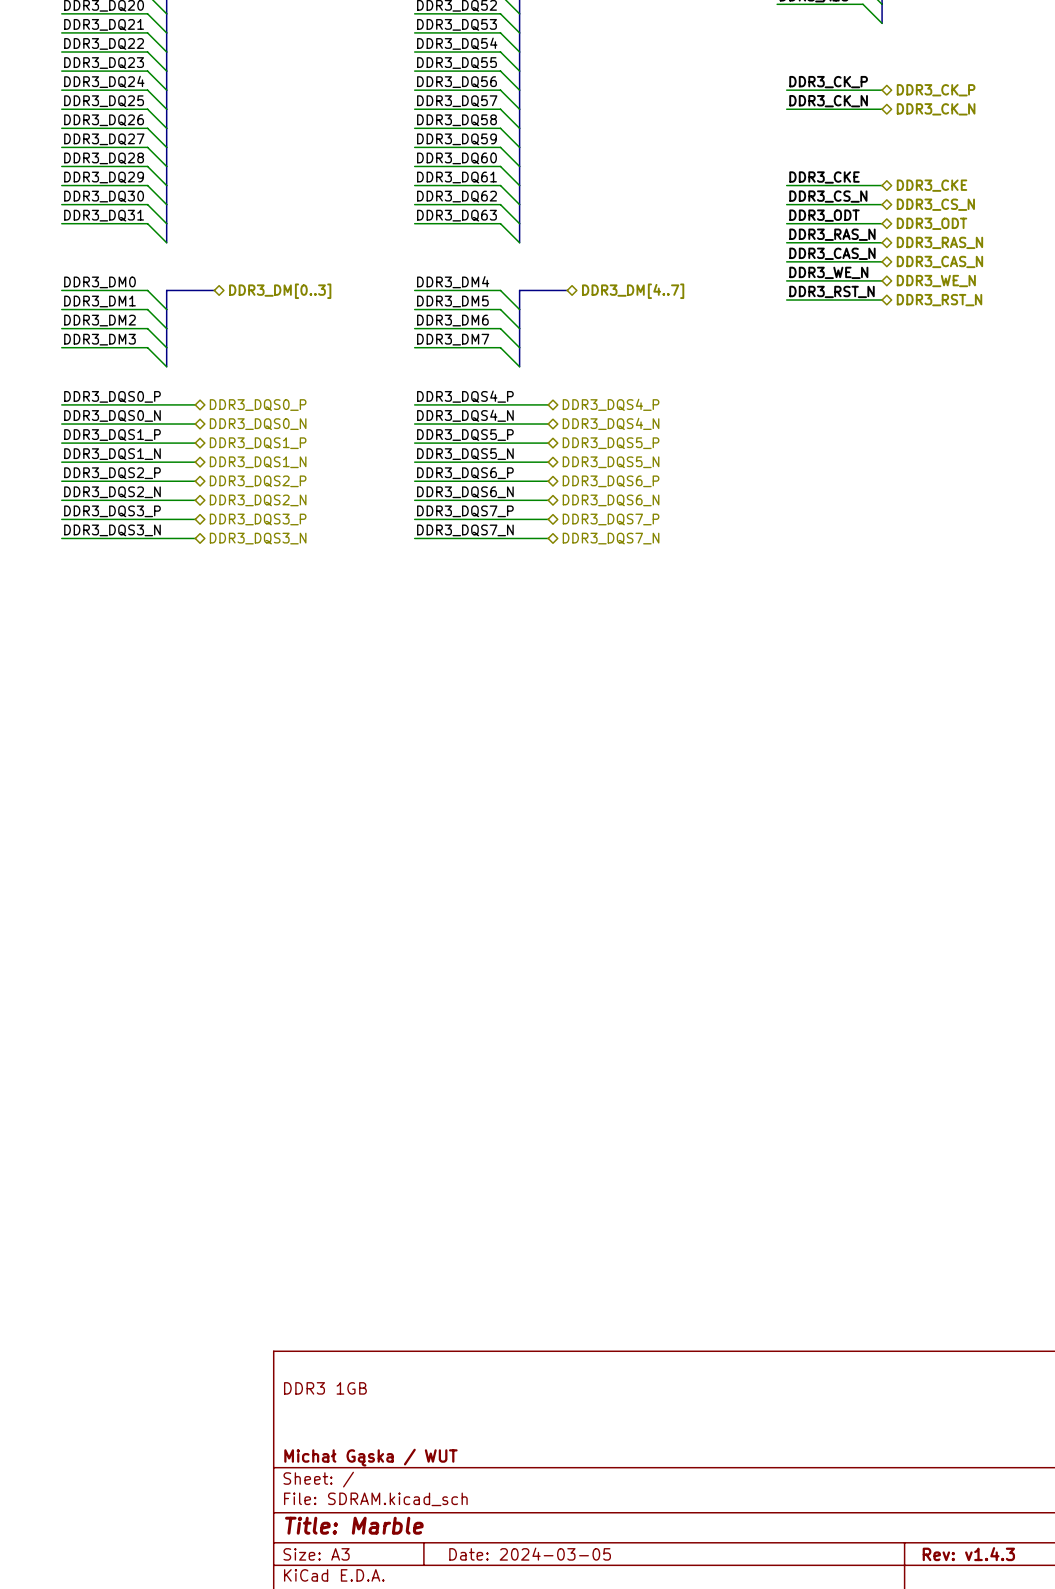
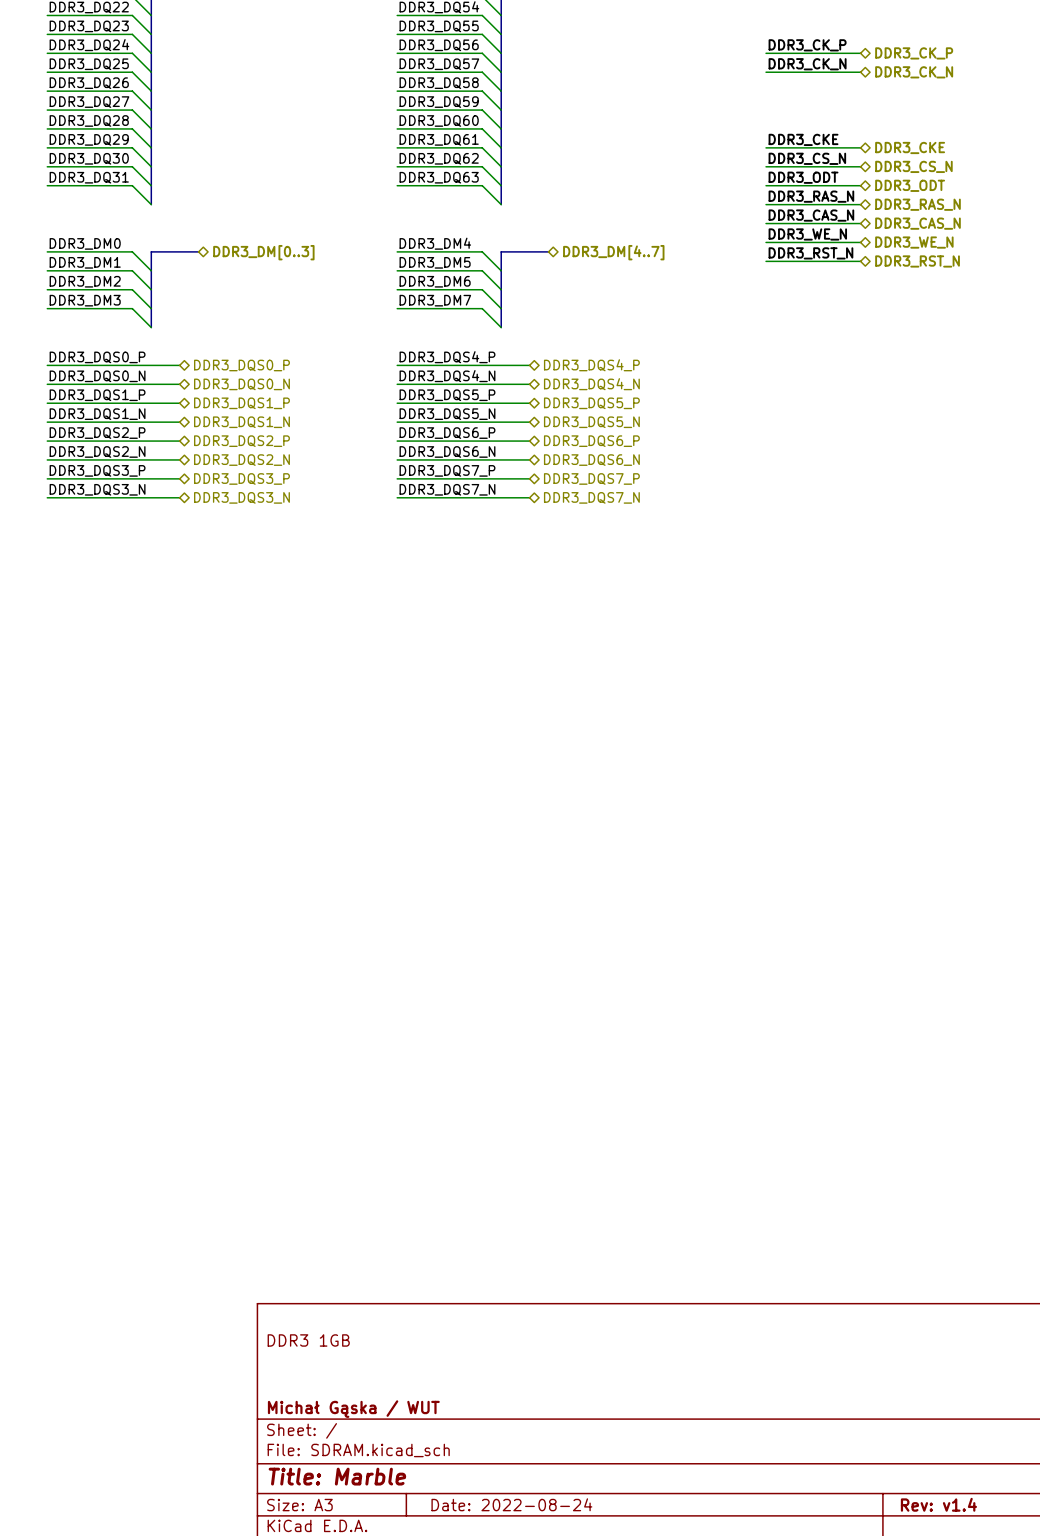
title block: Date: 2024-03-05 (530, 1554) -> Date: 2022-08-24 (511, 1504)
title block: Rev: v1.4.3 (968, 1554) -> Rev: v1.4 (938, 1504)

